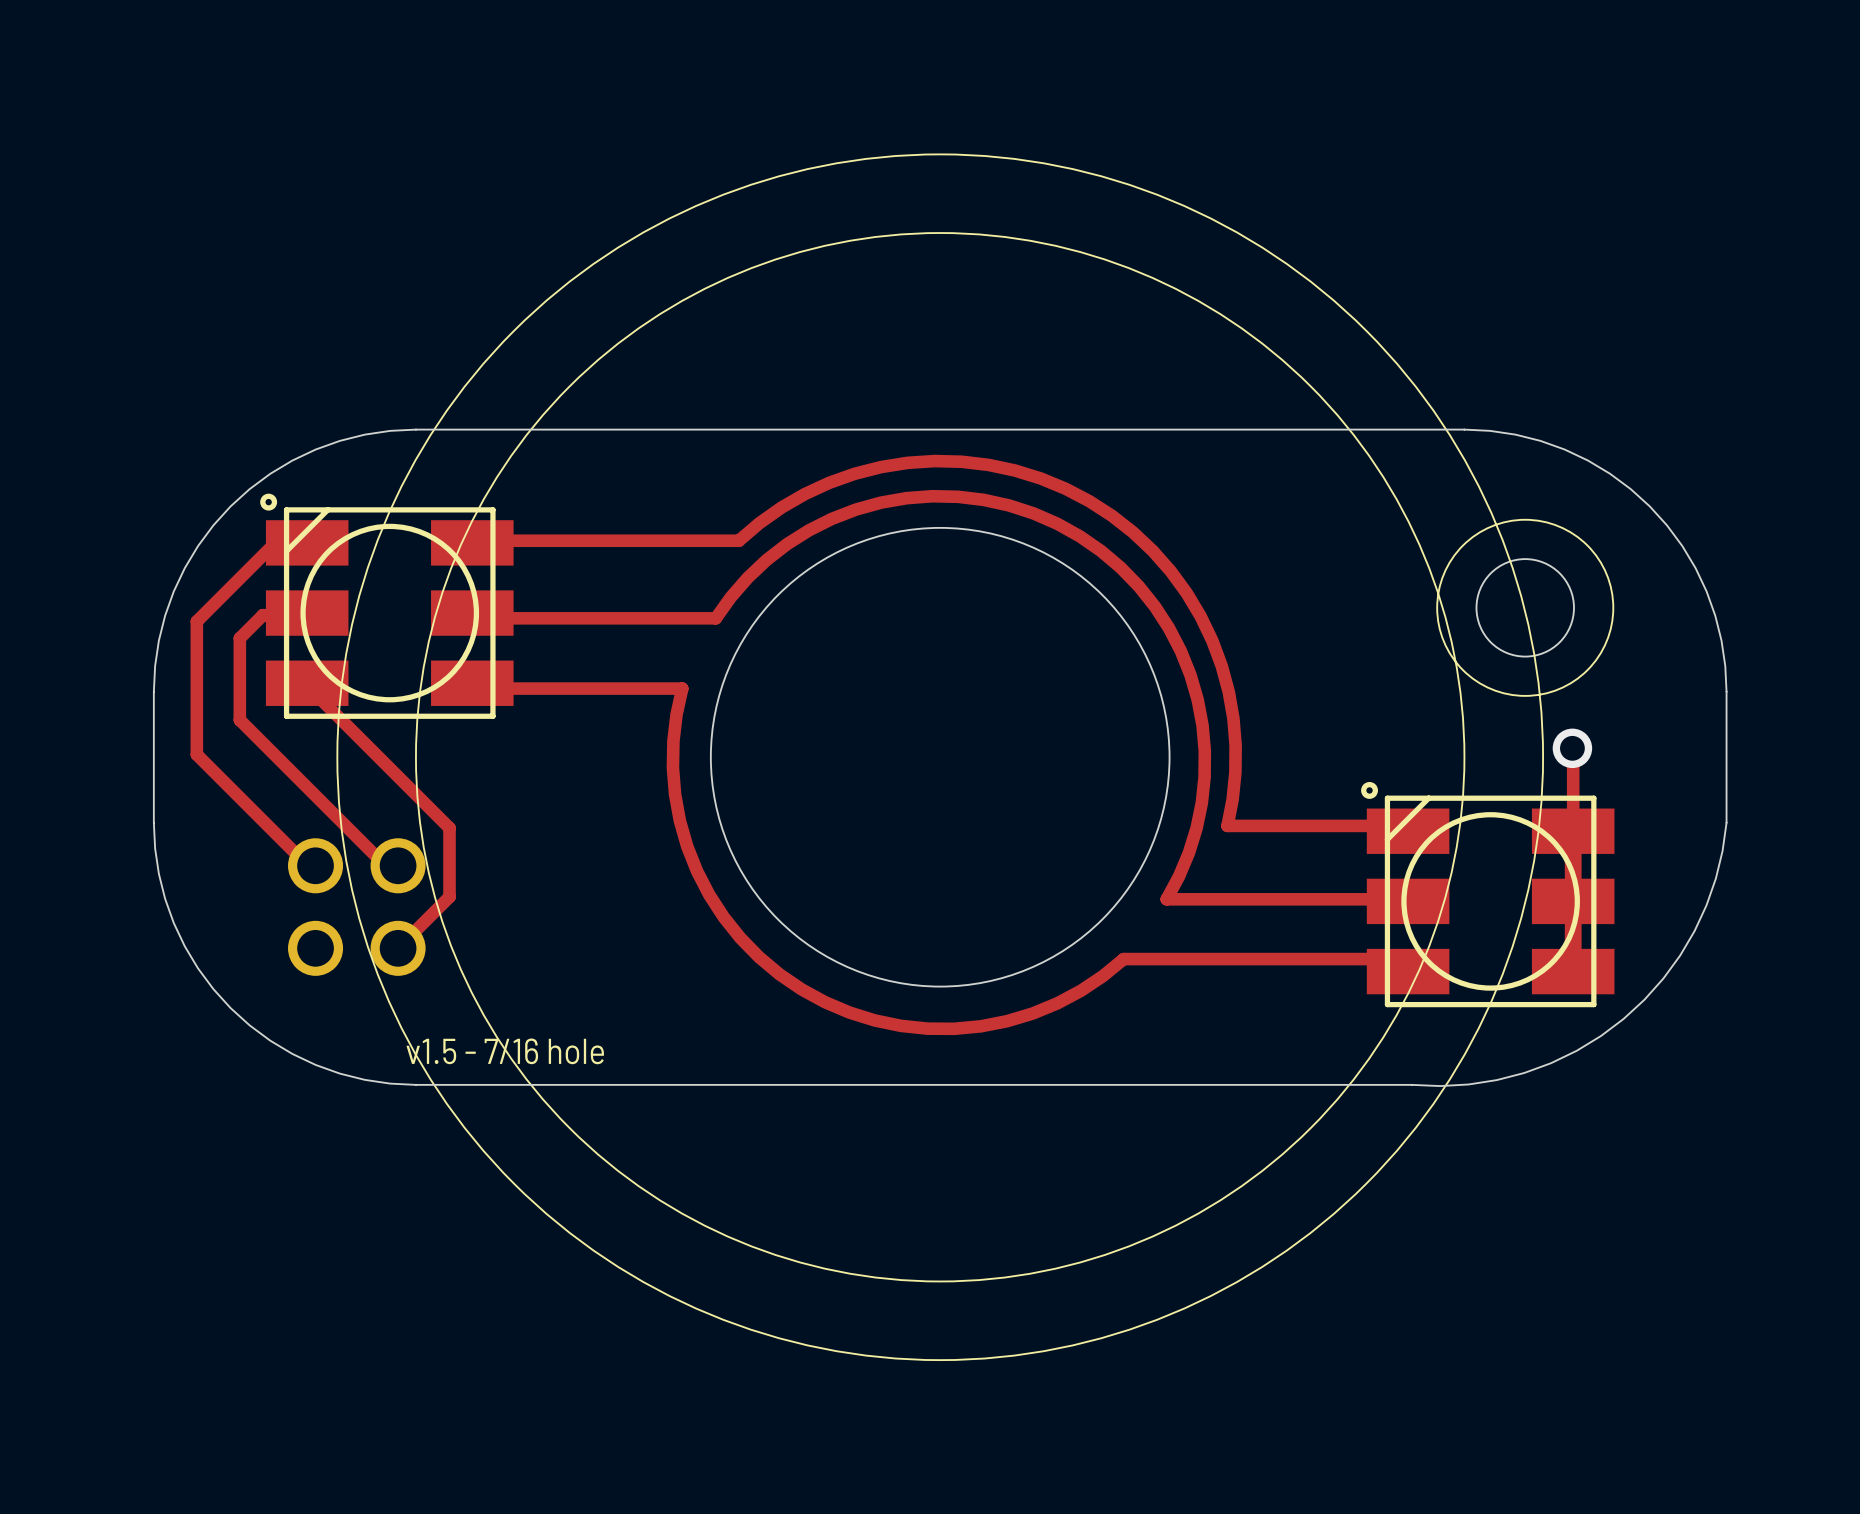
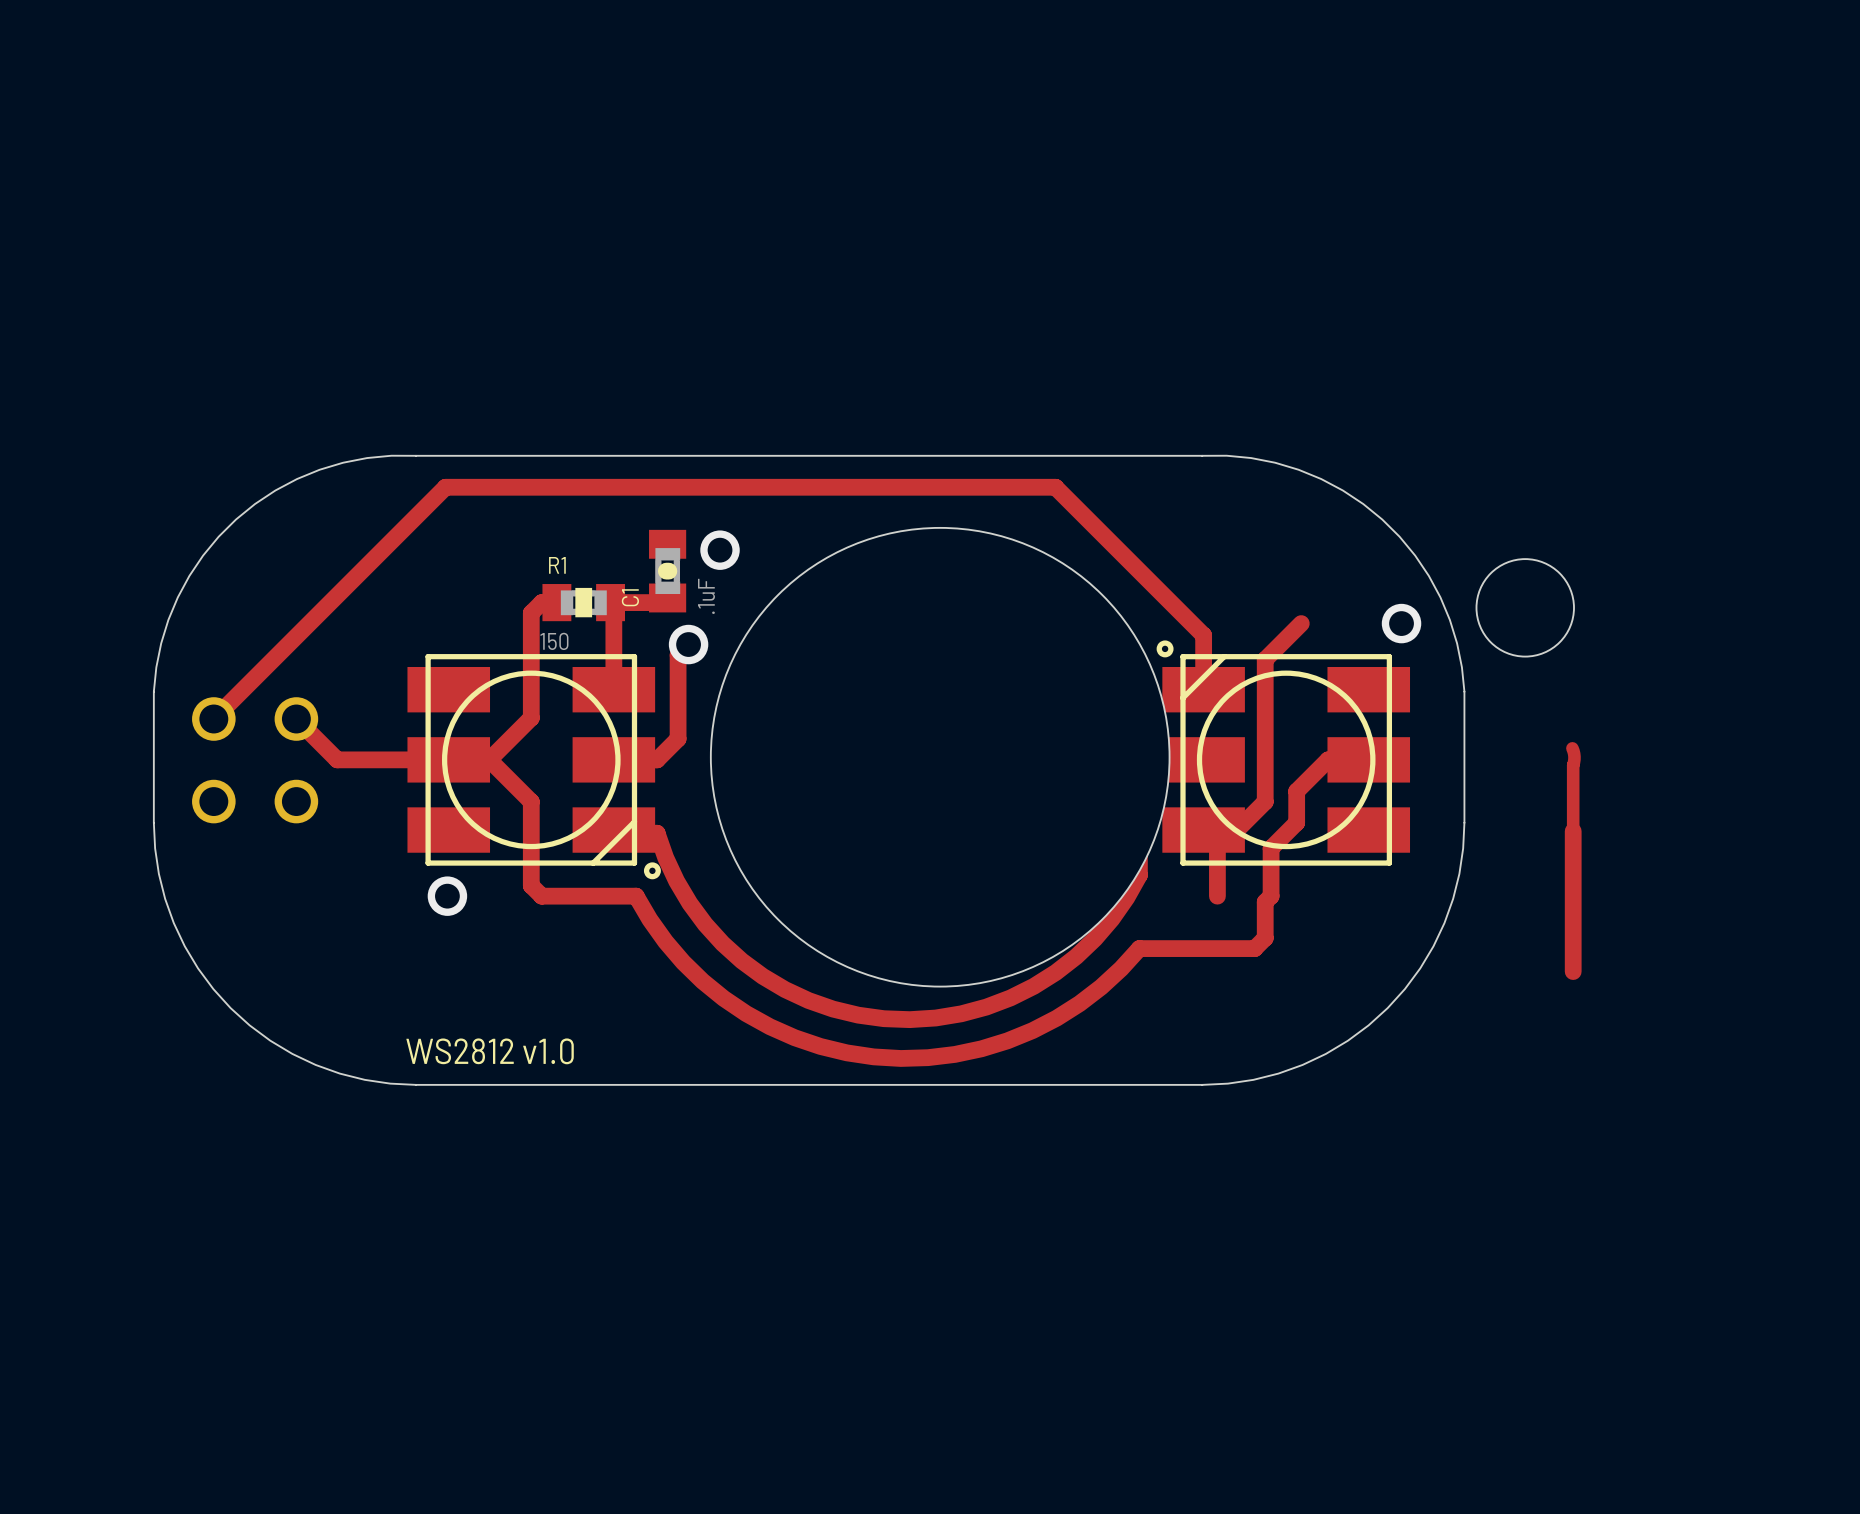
drawing: [336, 153, 1614, 1361] -> none
track: (307, 542) (276, 541) (196, 621) (196, 754) (308, 865) (315, 865) -> none
track: (472, 542) (474, 540) (738, 540) (781, 507) (804, 494) (854, 473) (907, 462) (934, 461) (961, 461) (1014, 470) (1040, 478) (1089, 501) (1133, 532) (1170, 571) (1200, 616) (1221, 666) (1233, 718) (1235, 772) (1227, 825) (1402, 825) (1408, 831) -> none
via: none -> (720, 550)
C1: none -> .1uF (667, 571)
track: none -> (667, 597) (662, 602) (610, 602) (613, 605) (613, 689)
track: none -> (556, 602) (541, 602) (531, 613) (531, 717) (489, 759)
R1: none -> 150 (583, 602)
part rotation: 0° (386, 606) -> 180° (534, 766)
part position: (386, 606) -> (534, 766)
track: (307, 613) (305, 615) (262, 615) (239, 638) (239, 720) (385, 865) (398, 865) -> none
track: (472, 613) (477, 618) (715, 618) (730, 597) (766, 560) (808, 530) (856, 509) (881, 502) (932, 496) (958, 496) (1009, 505) (1033, 513) (1079, 536) (1120, 567) (1154, 606) (1169, 628) (1190, 675) (1202, 725) (1204, 777) (1196, 828) (1178, 876) (1166, 899) (1405, 899) (1408, 901) -> none
track: none -> (1301, 623) (1265, 659) (1265, 801) (1236, 830) (1203, 830) (1217, 843) (1217, 896)
track: none -> (688, 644) (678, 655) (678, 738) (657, 759) (613, 759)
via: none -> (688, 644)
track: (307, 683) (307, 685) (449, 828) (449, 896) (398, 948) -> none
track: (472, 683) (477, 688) (682, 688) (673, 741) (675, 794) (687, 846) (709, 894) (740, 938) (779, 974) (824, 1002) (874, 1020) (901, 1025) (954, 1028) (1007, 1021) (1032, 1013) (1080, 990) (1123, 959) (1395, 959) (1408, 971) -> none
track: none -> (1203, 689) (1203, 635) (1055, 487) (445, 487) (213, 719)
board edge: (153, 691) (158, 640) (165, 615) (184, 568) (213, 525) (249, 489) (292, 460) (339, 440) (364, 434) (415, 429) (1464, 429) (1515, 434) (1540, 440) (1587, 460) (1610, 473) (1630, 489) (1667, 525) (1695, 568) (1715, 615) (1725, 666) (1726, 822) (1722, 850) (1706, 905) (1680, 955) (1644, 999) (1623, 1018) (1576, 1050) (1524, 1072) (1496, 1080) (1440, 1086) (1202, 1084) -> (153, 691) (156, 667) (168, 619) (189, 575) (218, 536) (255, 504) (297, 479) (343, 462) (367, 458) (391, 455) (1226, 455) (1275, 462) (1298, 469) (1342, 490) (1363, 504) (1399, 536) (1428, 575) (1449, 619) (1461, 667) (1464, 691) (1464, 822) (1459, 873) (1453, 898) (1433, 946) (1404, 989) (1368, 1025) (1325, 1053) (1278, 1073) (1253, 1079) (1202, 1084)
track: none -> (296, 719) (337, 759) (489, 759)
via position: (1572, 748) -> (1401, 623)
track: none -> (489, 759) (531, 801) (531, 885) (541, 896) (636, 896) (665, 941) (683, 962) (702, 981) (746, 1013) (794, 1037) (820, 1046) (846, 1052) (900, 1058) (954, 1054) (981, 1048) (1032, 1030) (1056, 1018) (1101, 987) (1139, 948) (1254, 948) (1265, 938) (1265, 902) (1271, 896) (1271, 848) (1296, 822) (1296, 791) (1328, 759) (1368, 759)
track: none -> (1203, 759) (1160, 759) (1139, 780) (1139, 875) (1126, 897) (1094, 938) (1076, 956) (1033, 986) (986, 1007) (935, 1018) (883, 1018) (858, 1015) (808, 1000) (785, 989) (741, 960) (705, 924) (676, 881) (657, 833) (617, 833) (613, 830)
part: none -> (255, 760)
part position: (1487, 894) -> (1283, 753)
via: none -> (447, 896)
part: (356, 907) -> none
text: v1.5 - 7/16 hole (505, 1051) -> WS2812 v1.0 (490, 1051)

